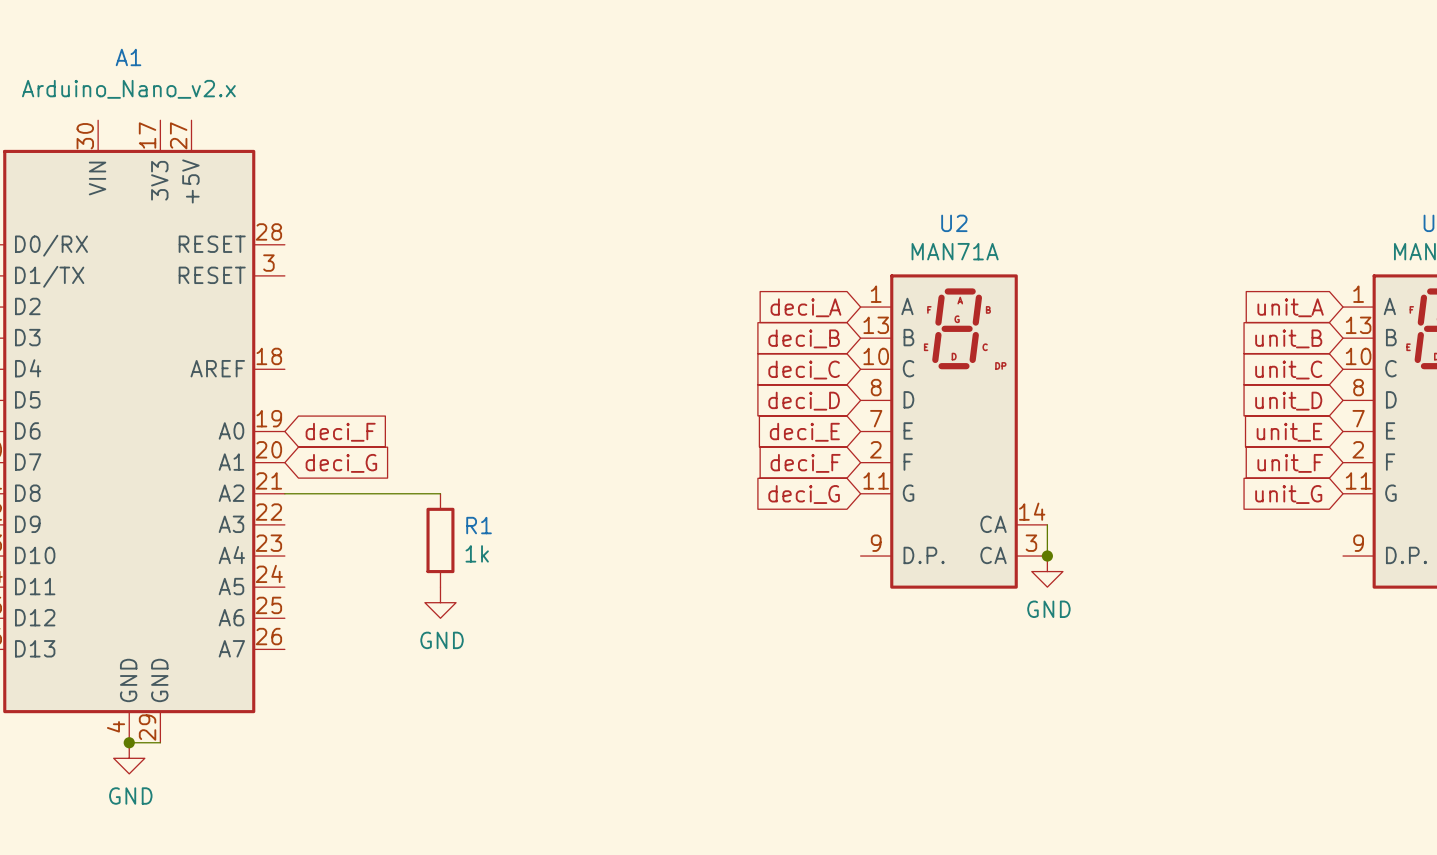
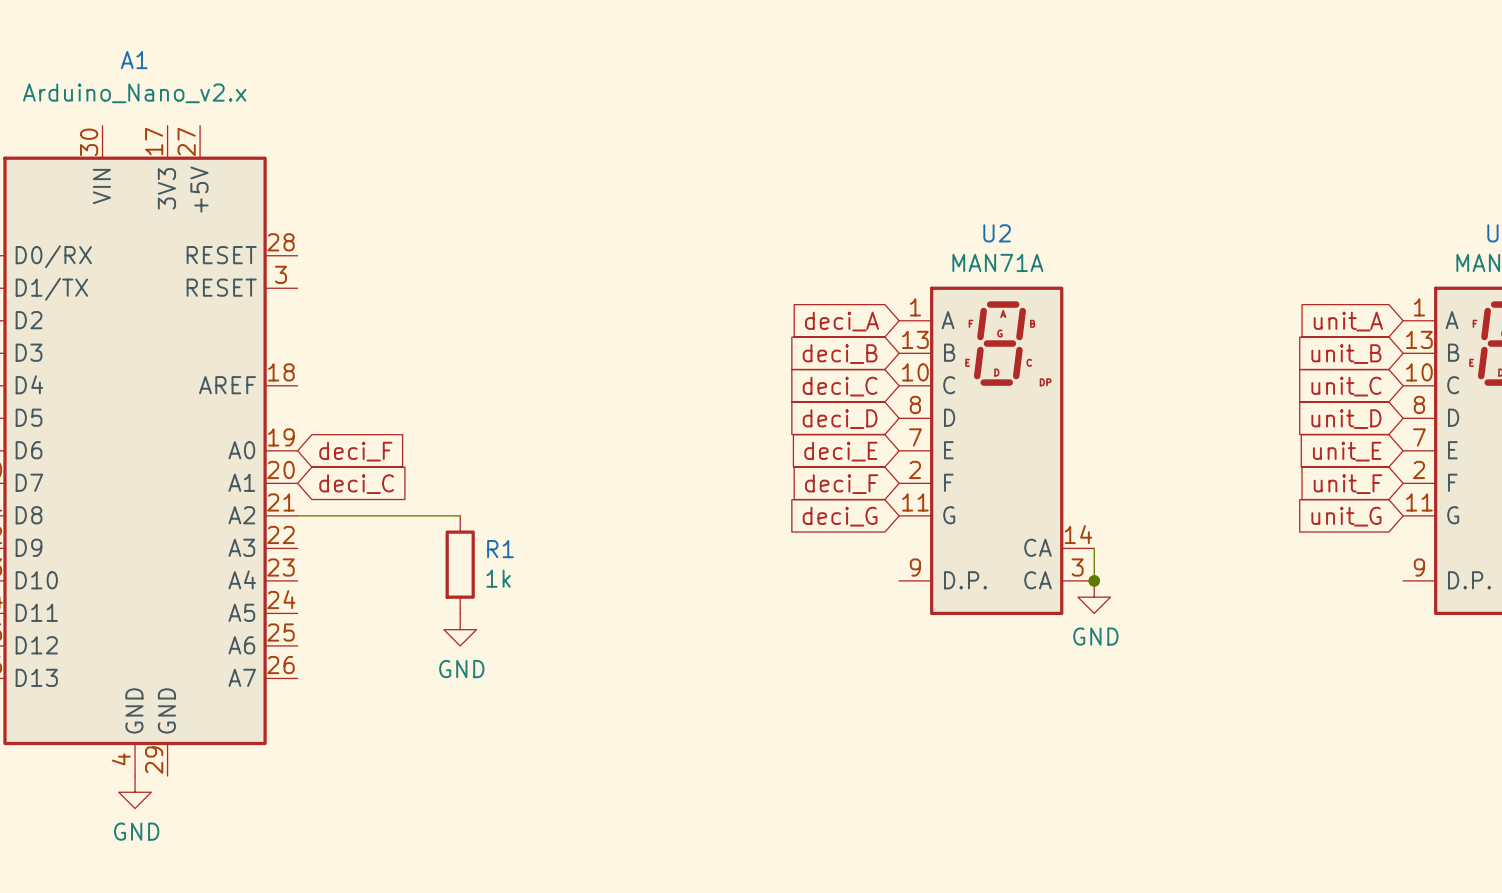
global label: deci_G (341, 463) -> deci_C (356, 484)
wire: (129, 742) (160, 742) -> none
junction: (129, 742) -> none

